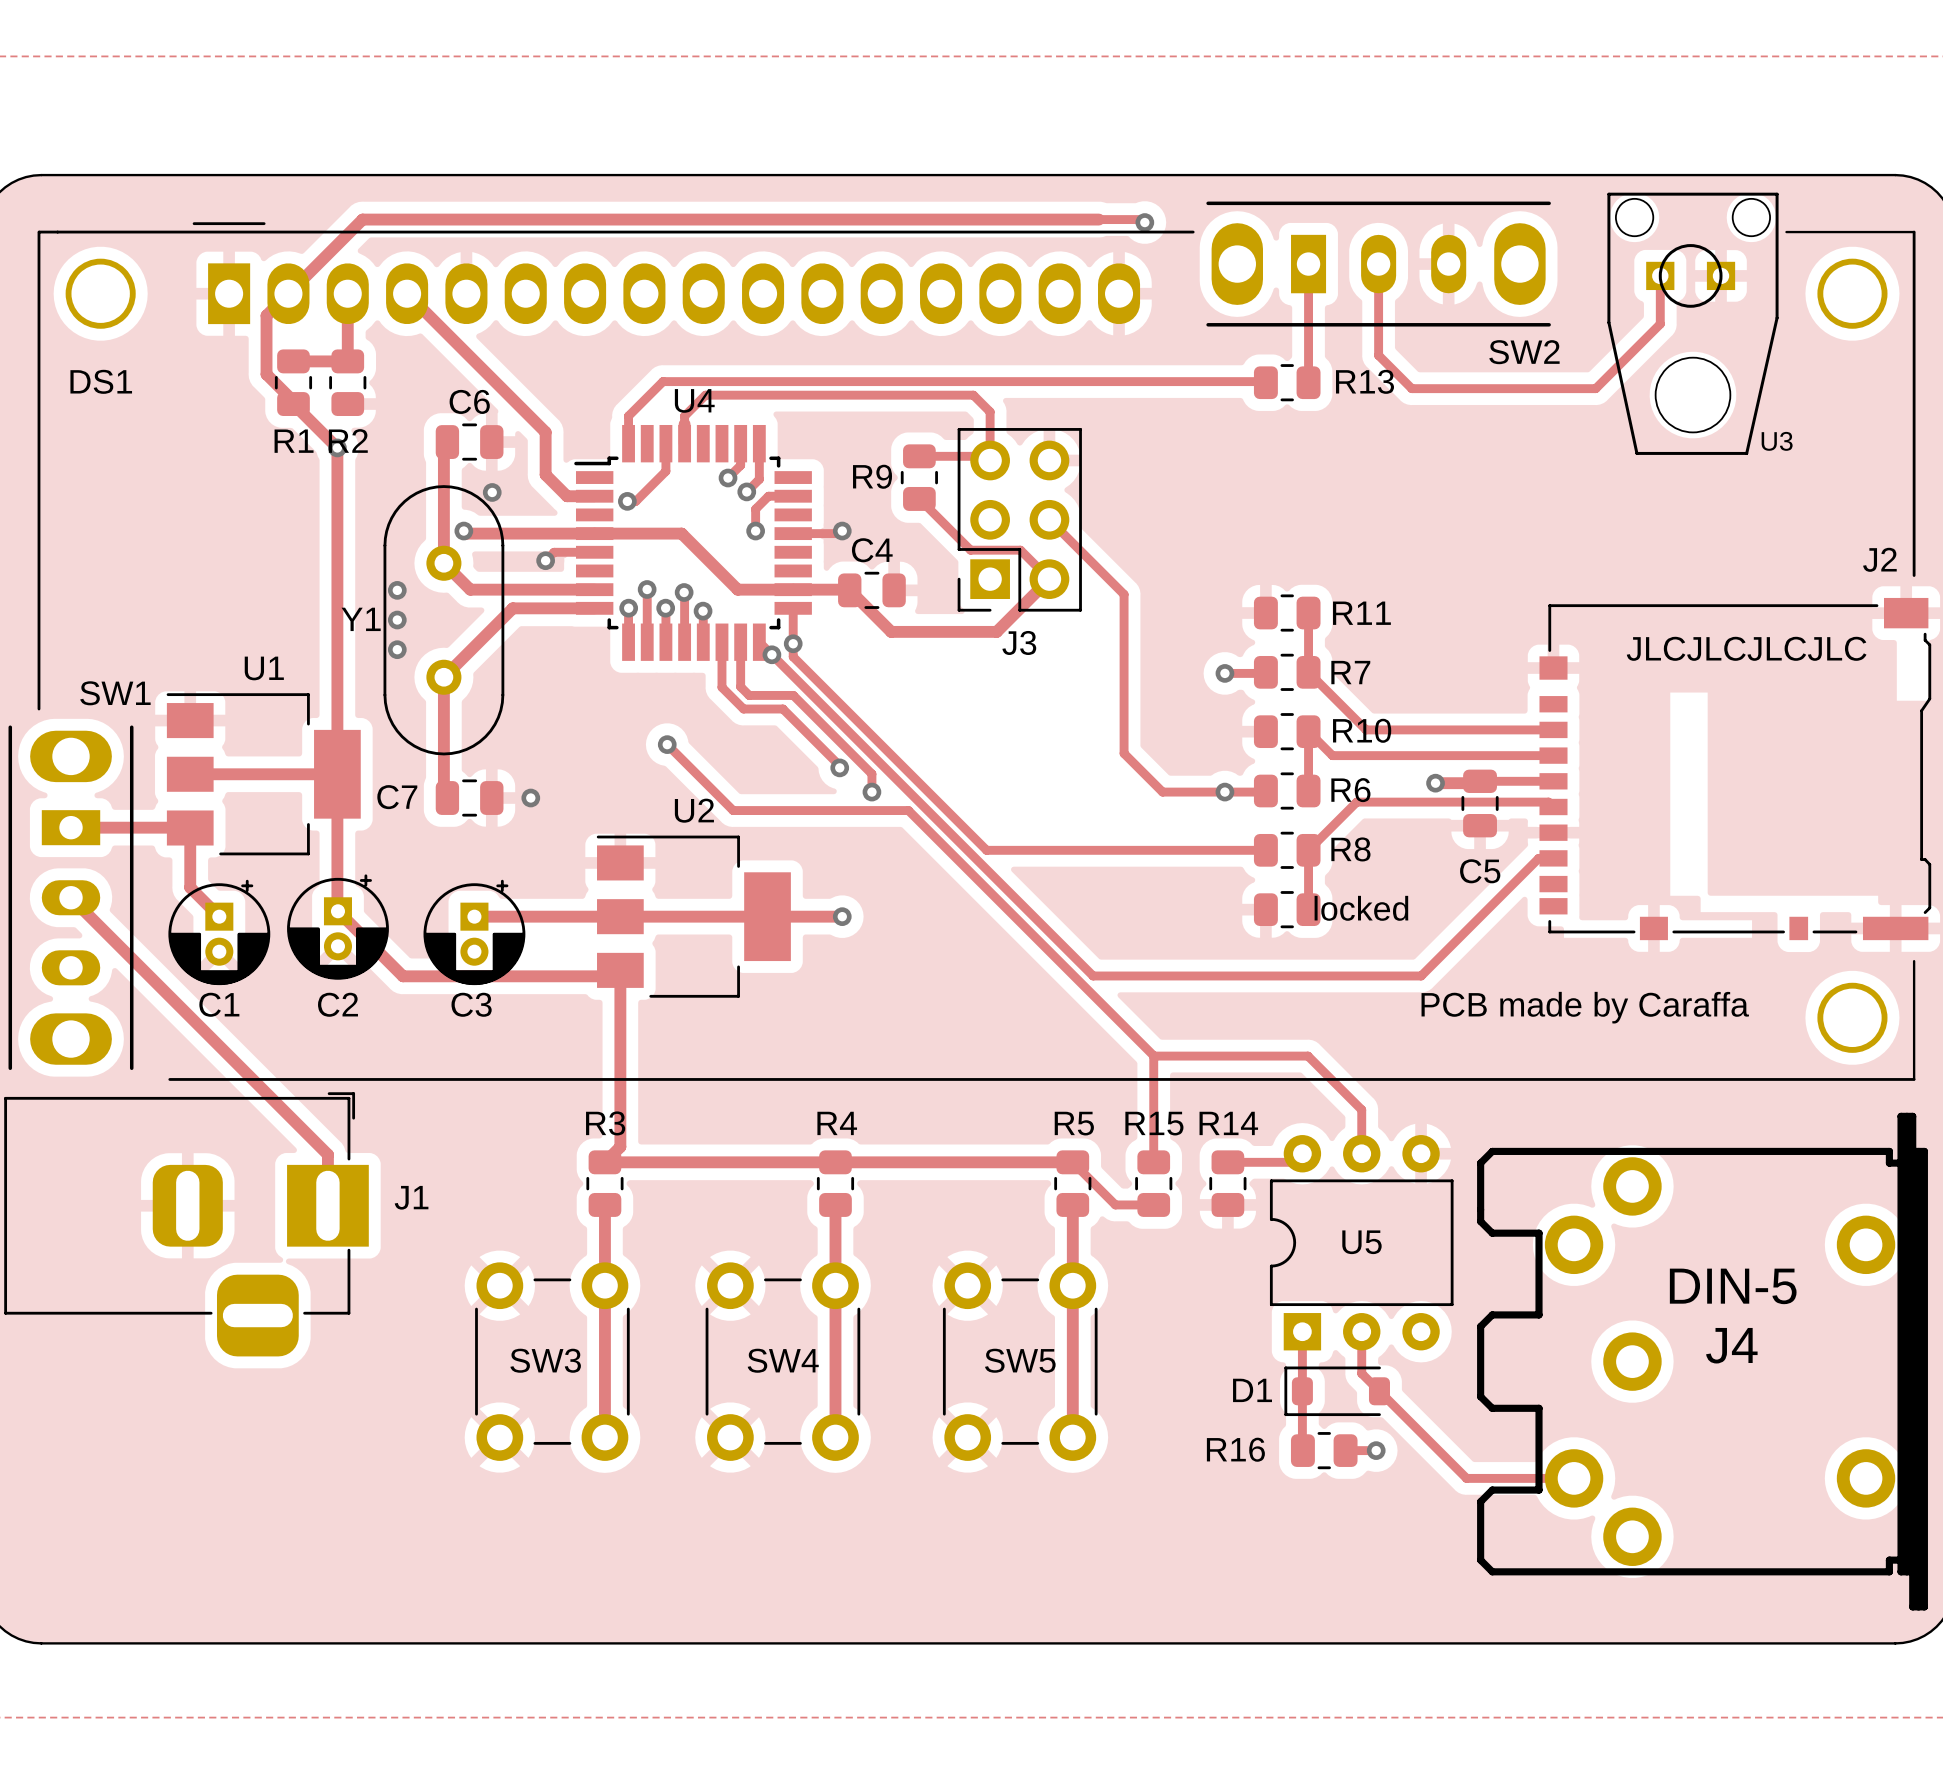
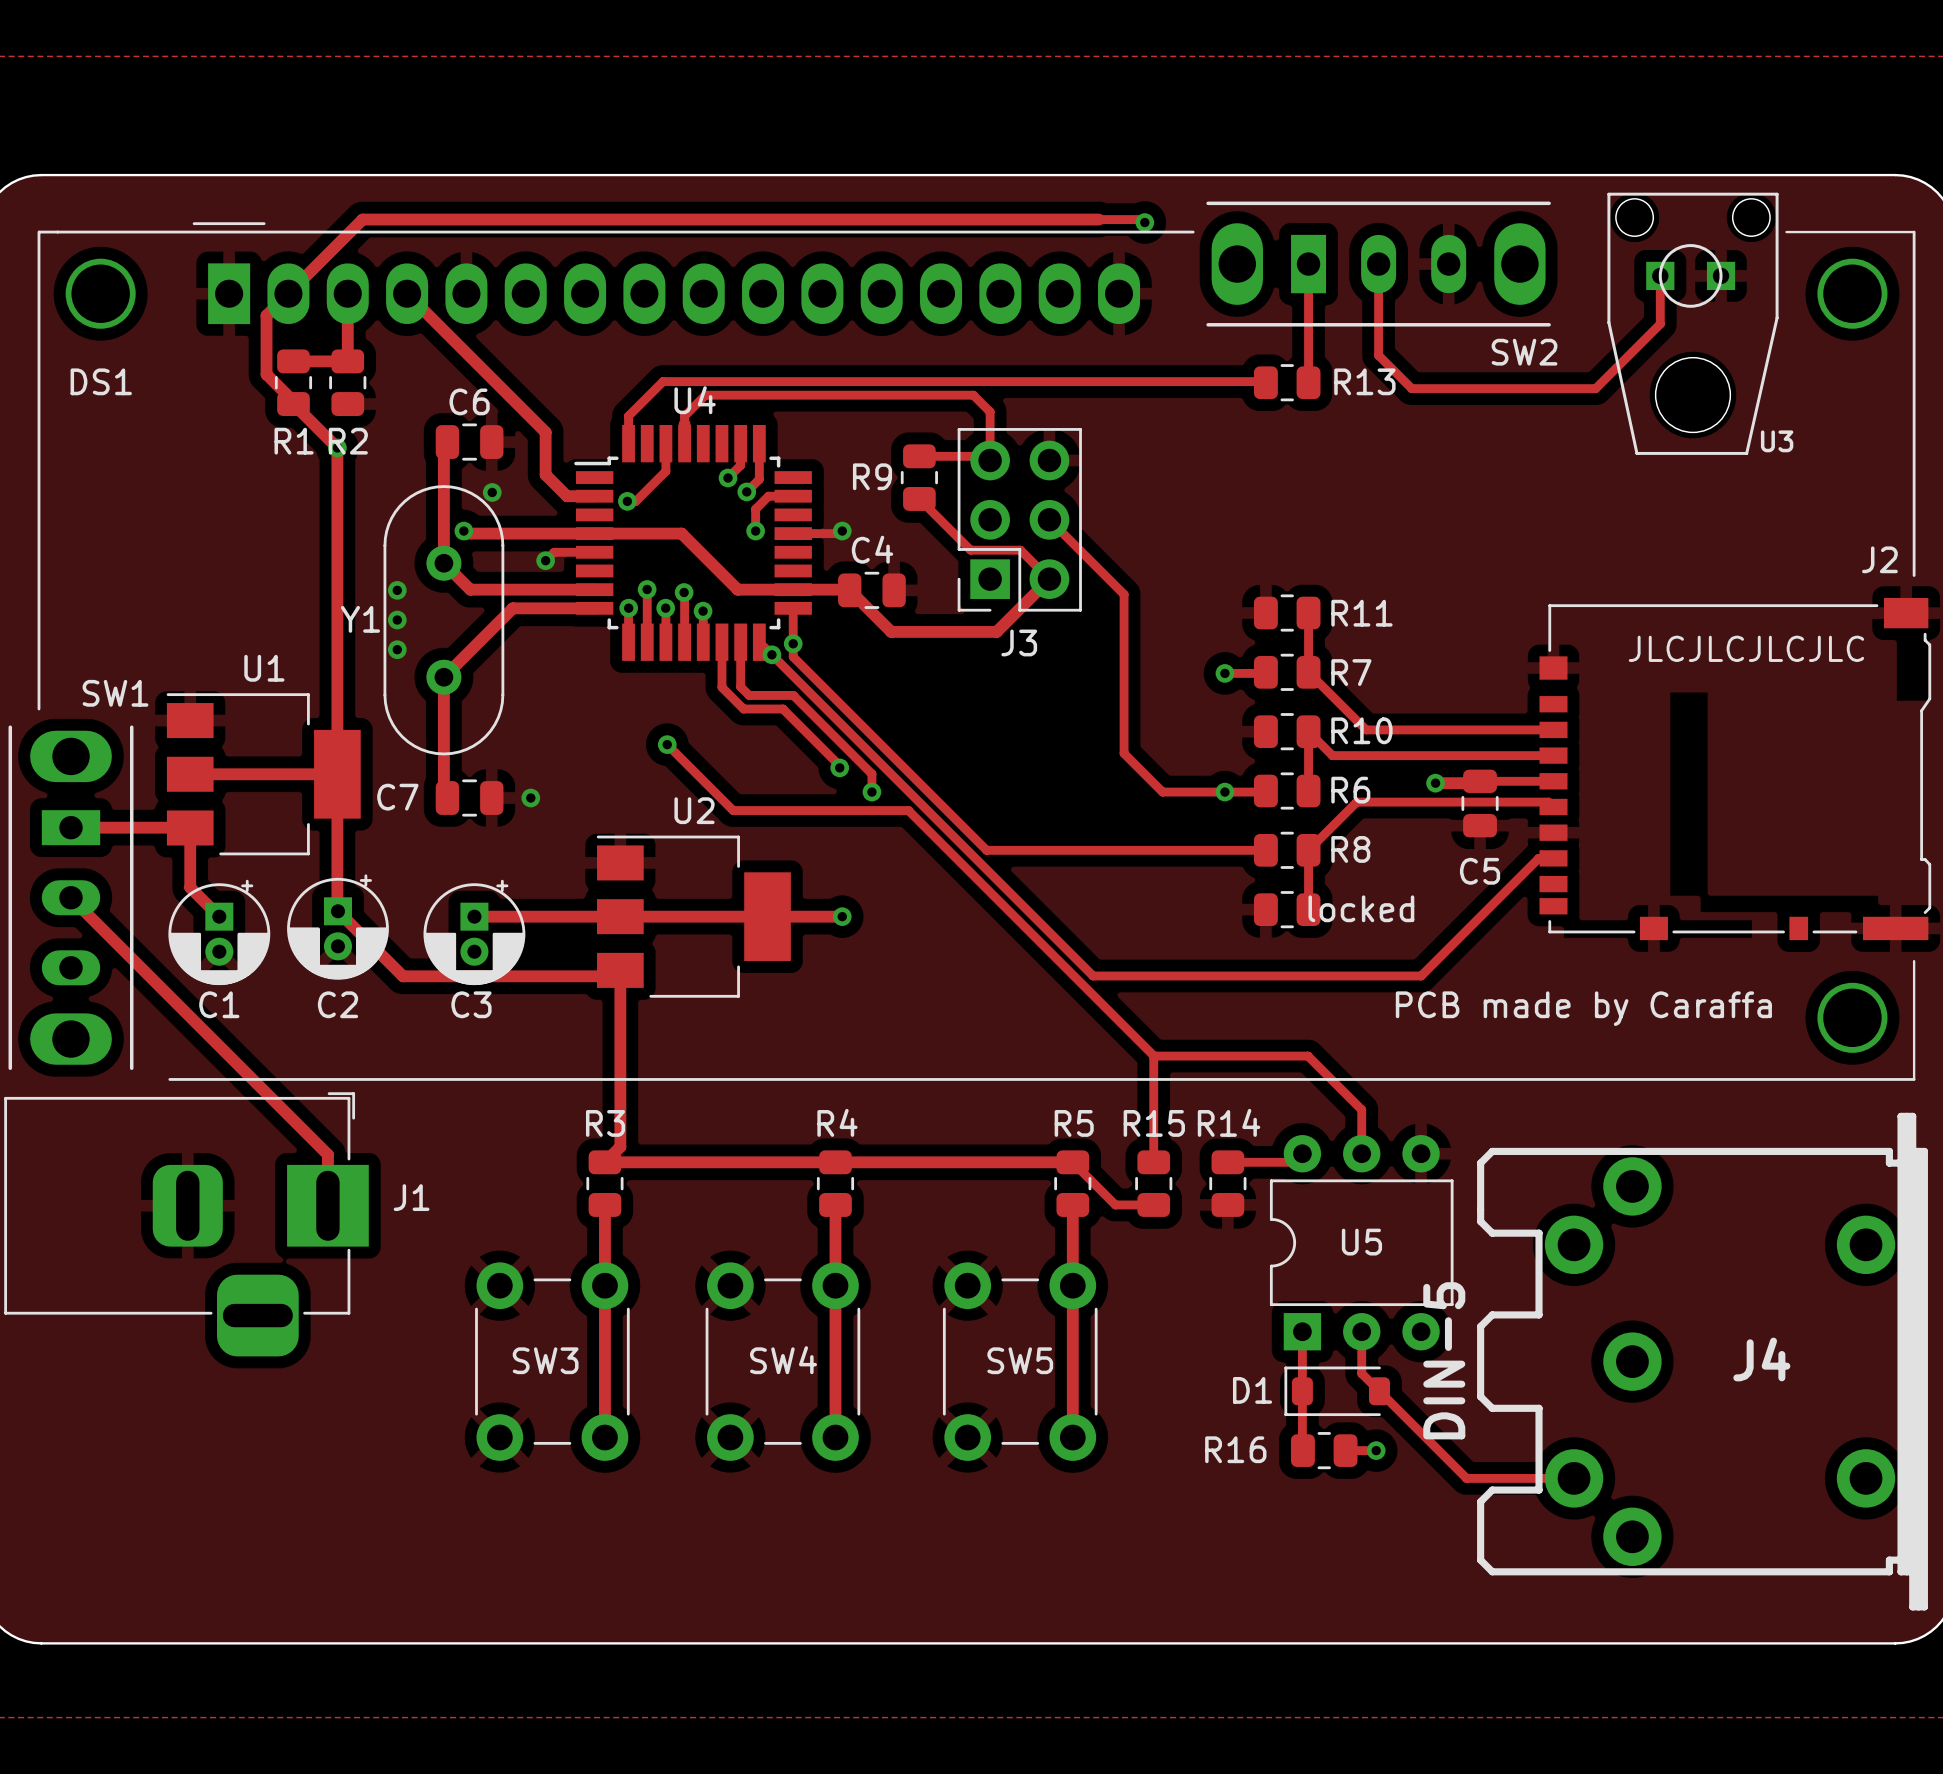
J4 value rotation: 0° (1733, 1286) -> 90° counterclockwise (1444, 1360)
J4 value position: DIN-5 (1733, 1286) -> DIN-5 (1444, 1360)
J4 name position: J4 (1731, 1345) -> J4 (1761, 1359)

